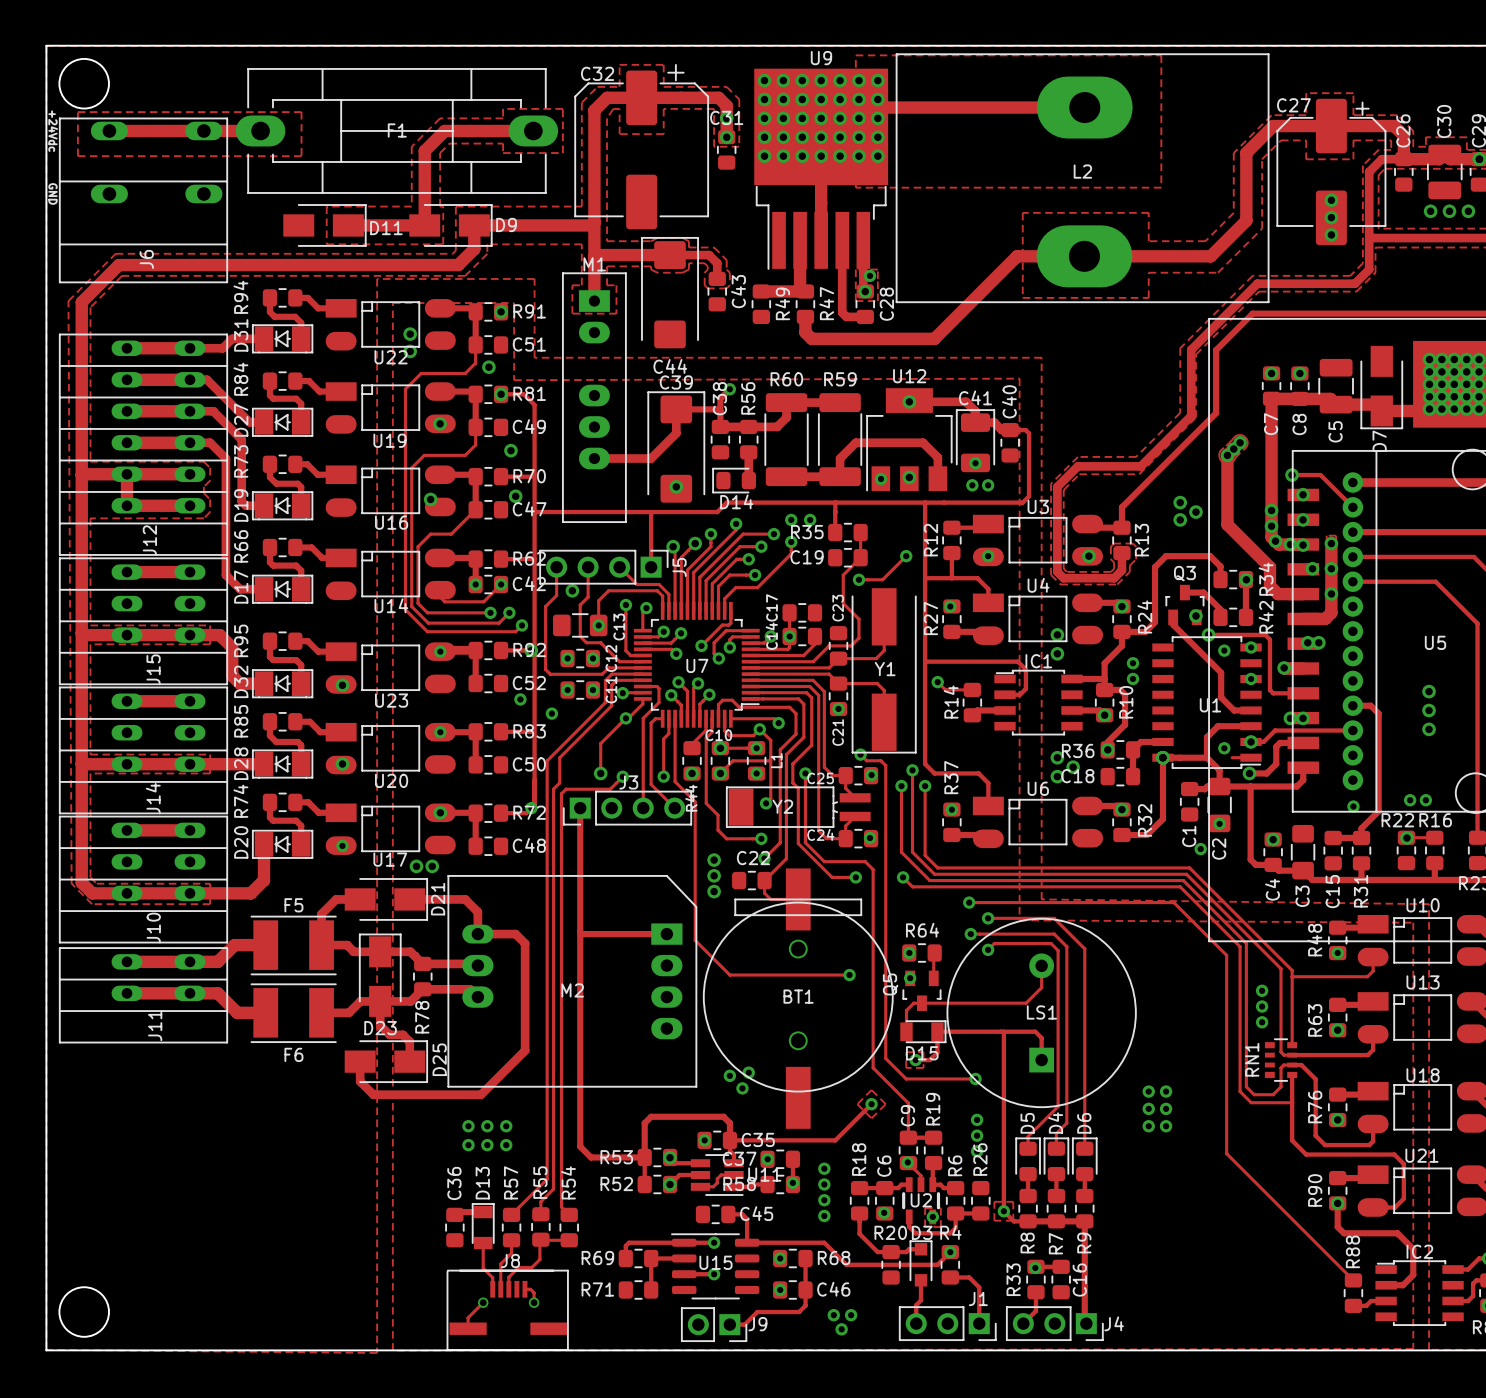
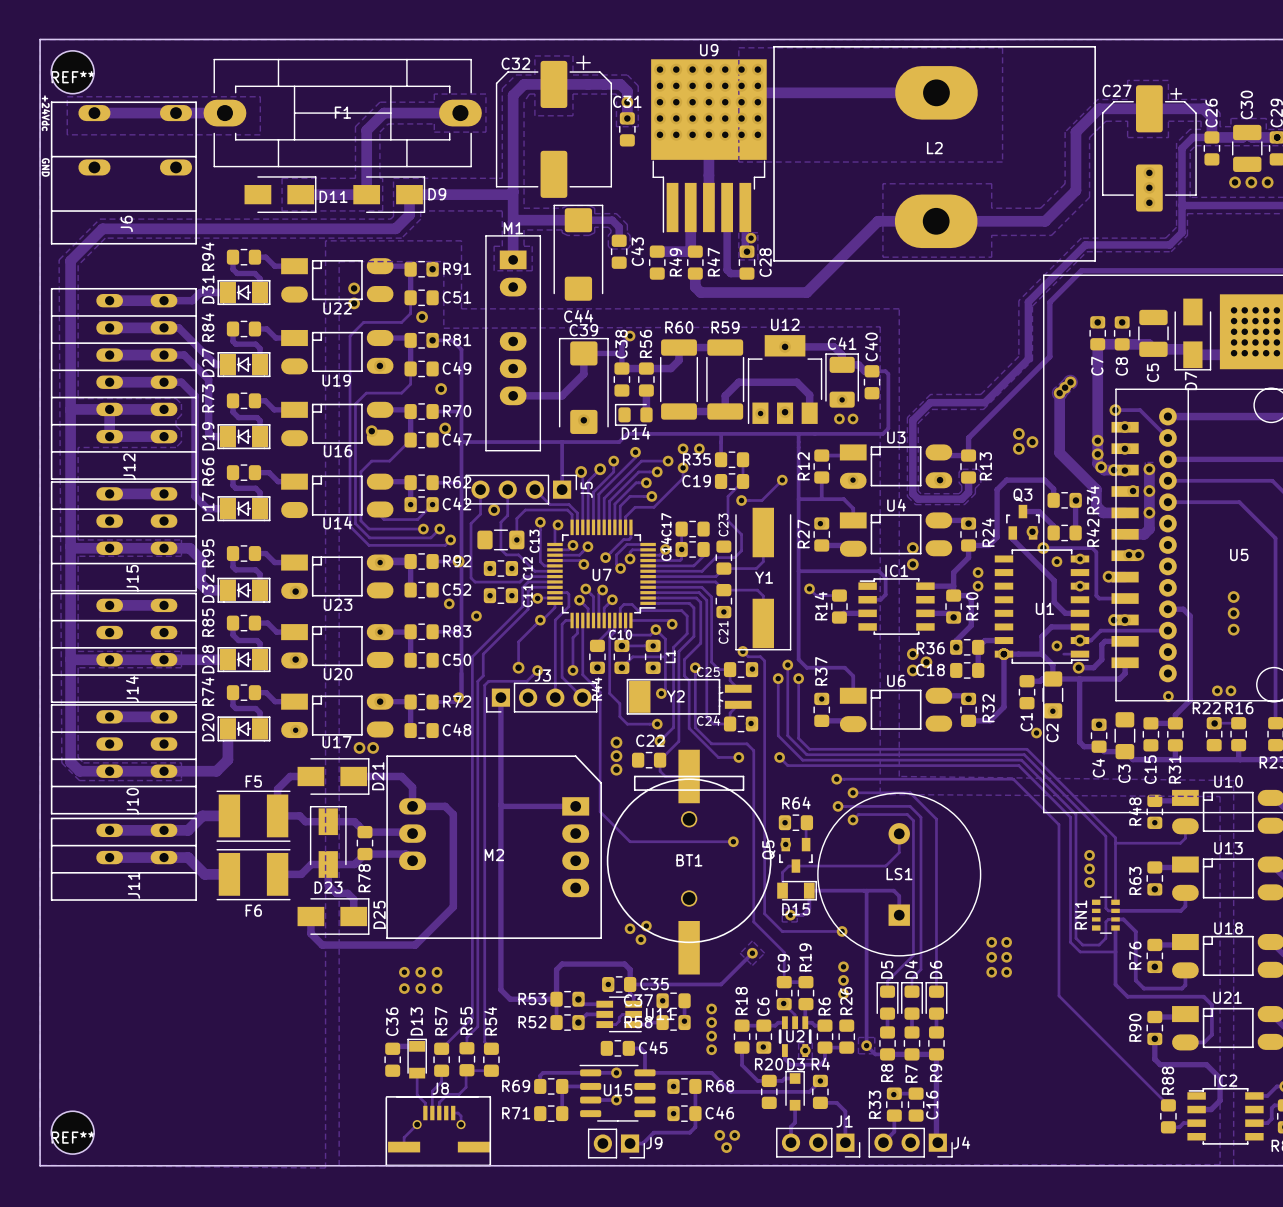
REF**: none -> (72, 72)
REF**: none -> (72, 1132)

